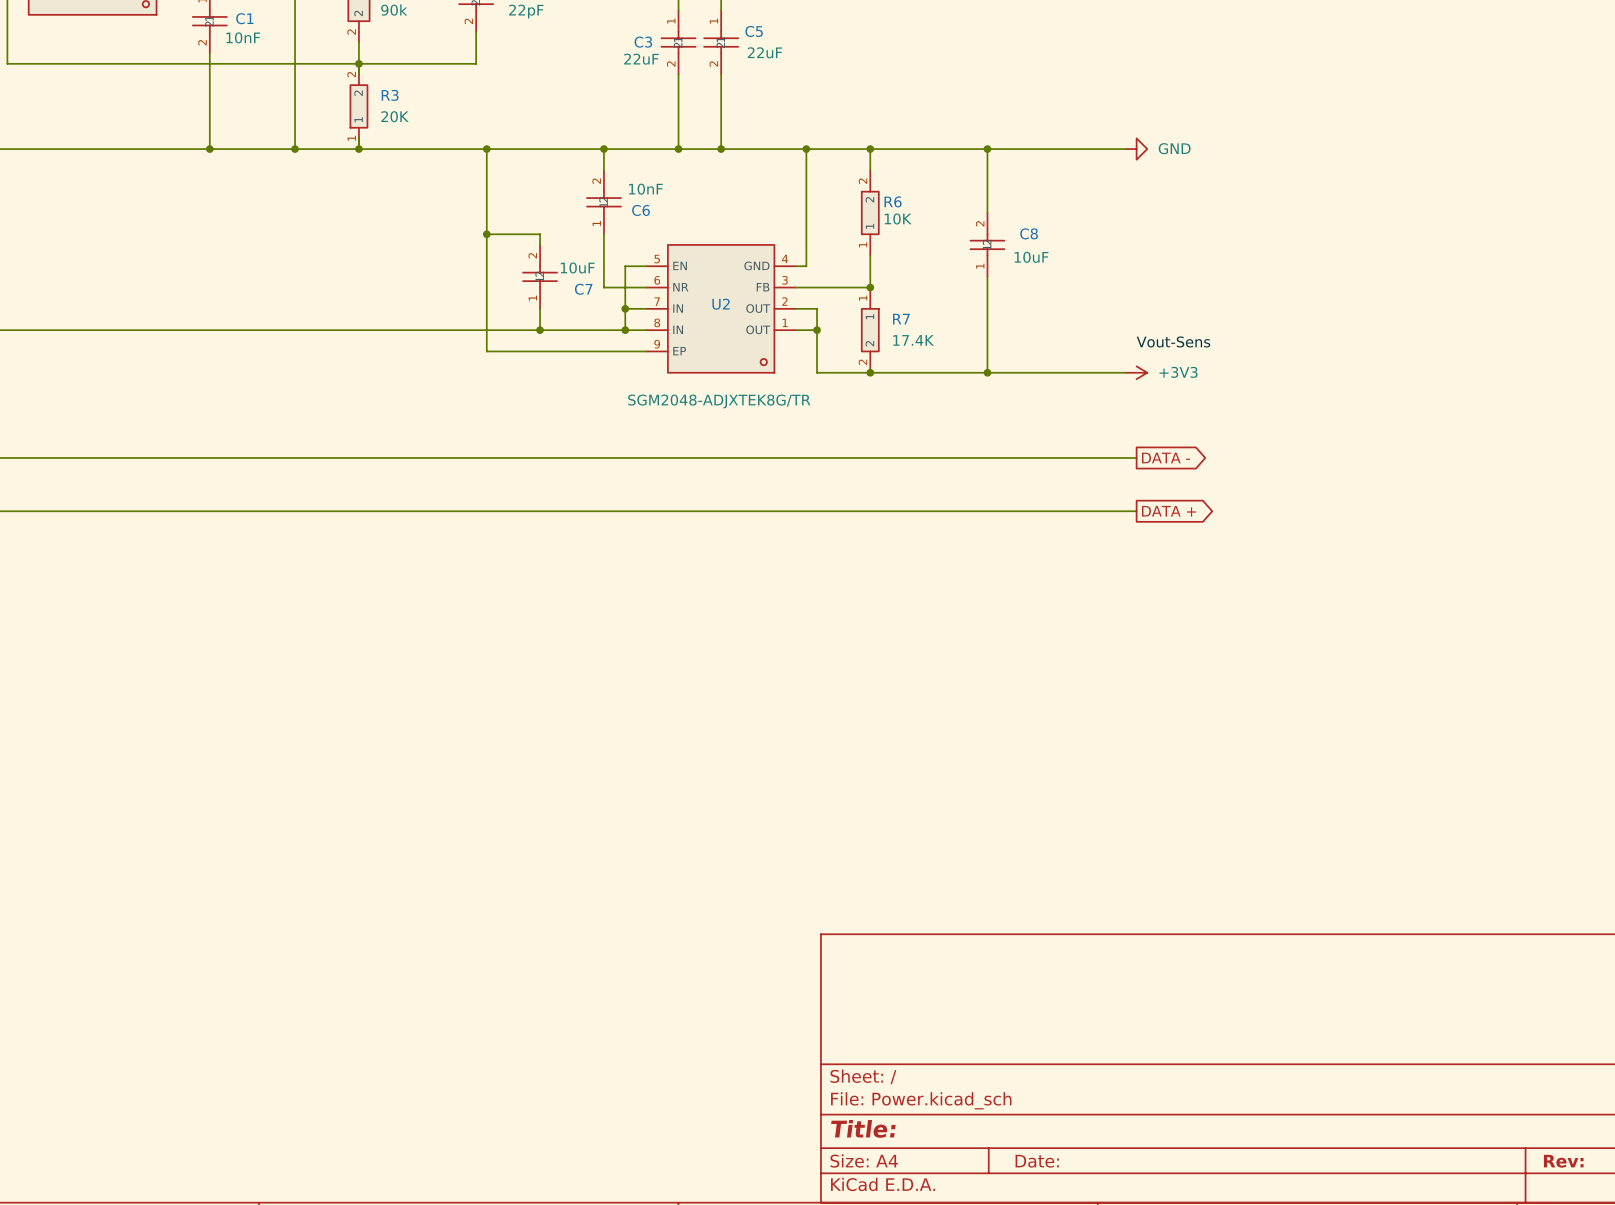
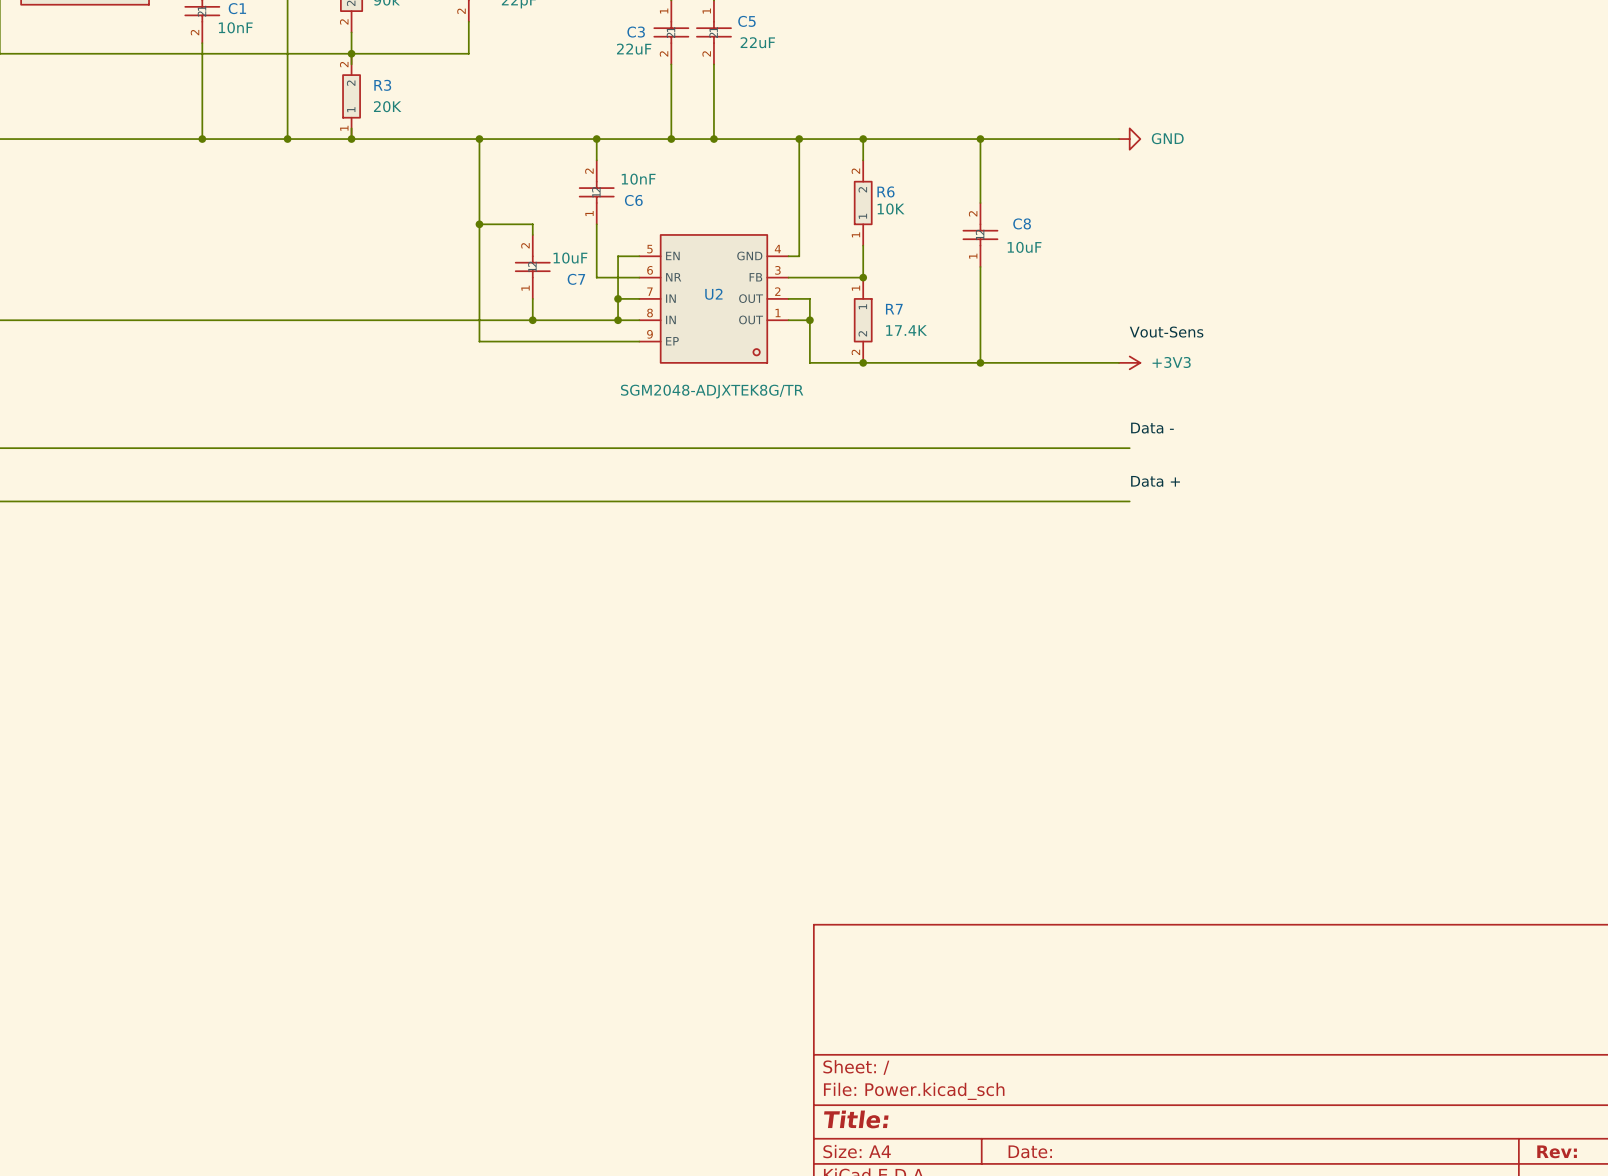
label: none -> Data - (1152, 428)
global label: DATA - (1166, 457) -> none
label: none -> Data + (1155, 481)
global label: DATA + (1169, 511) -> none

